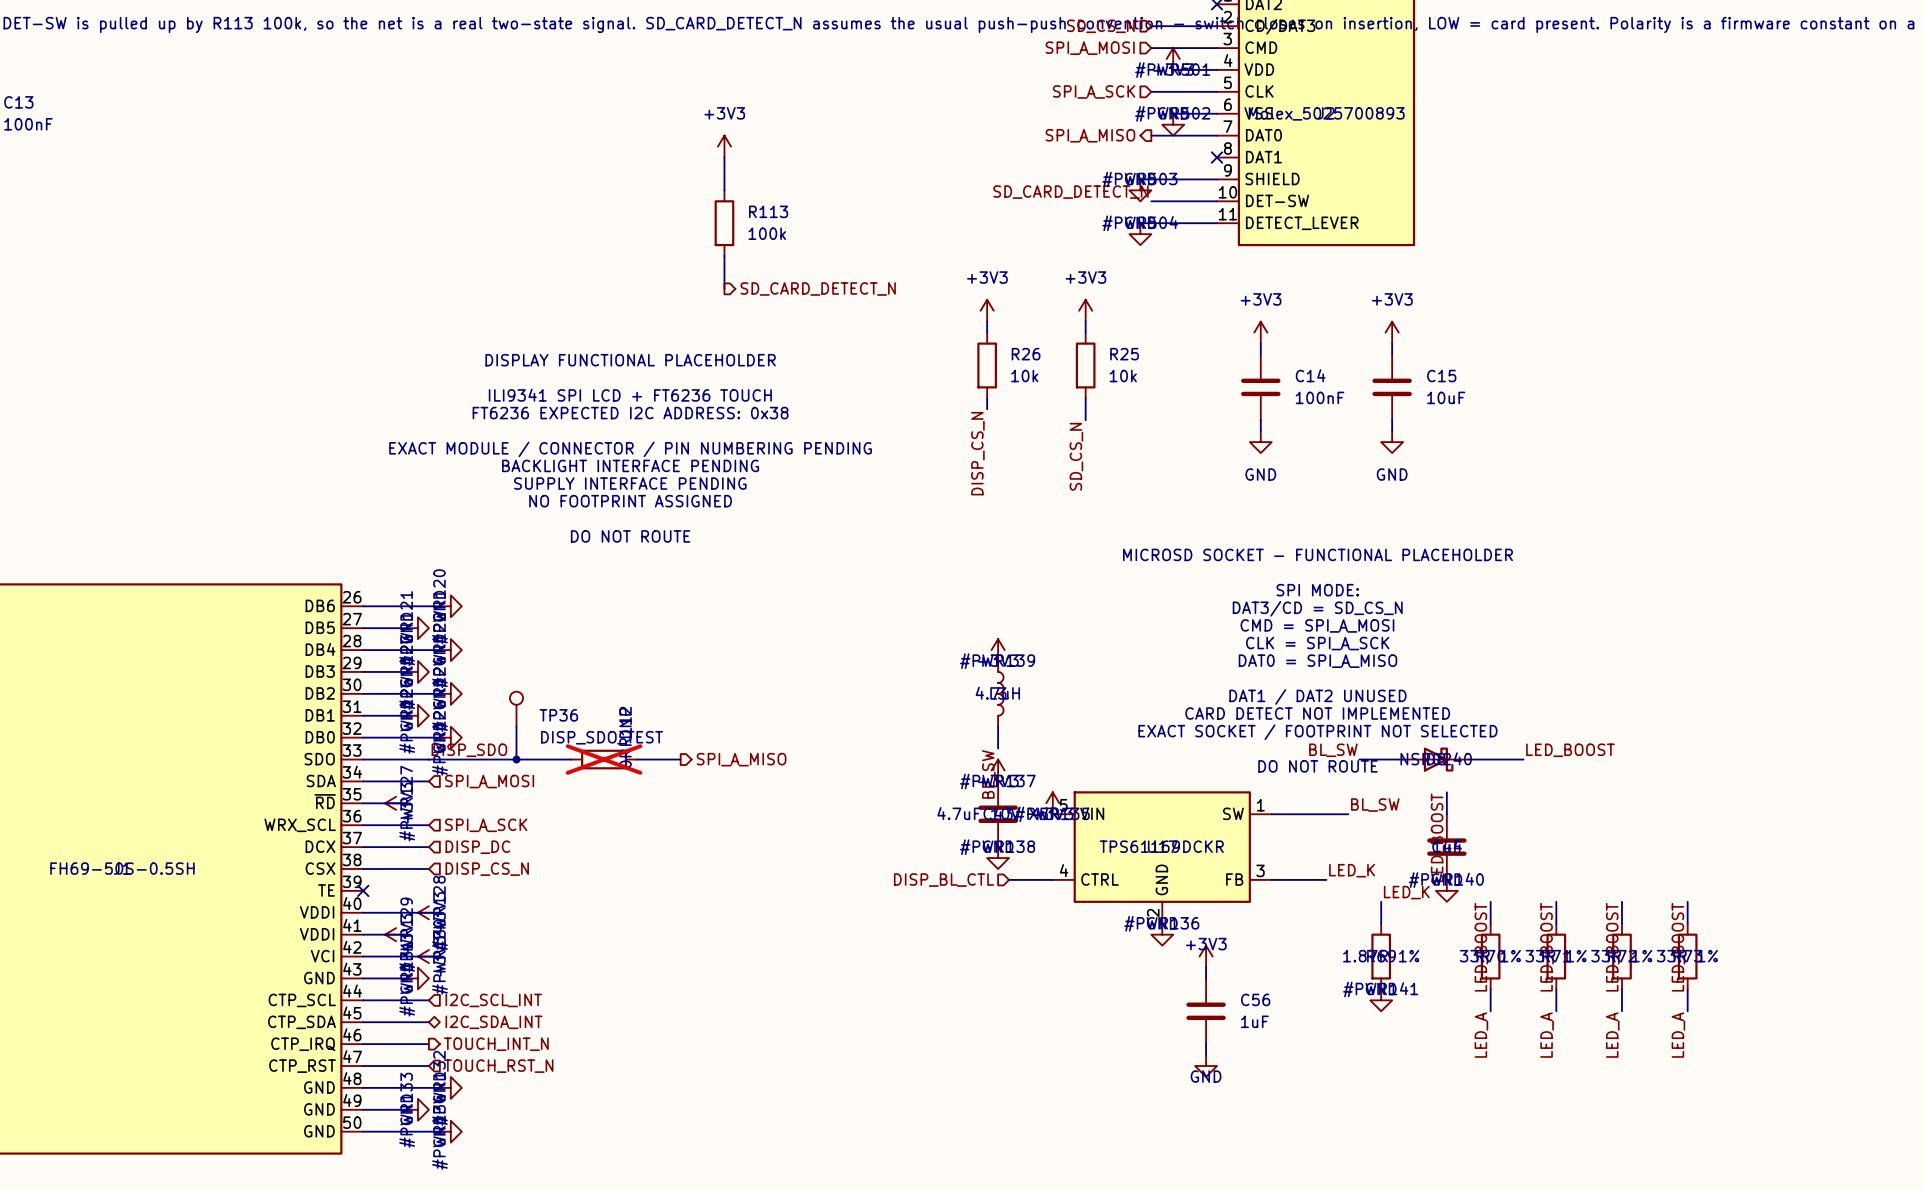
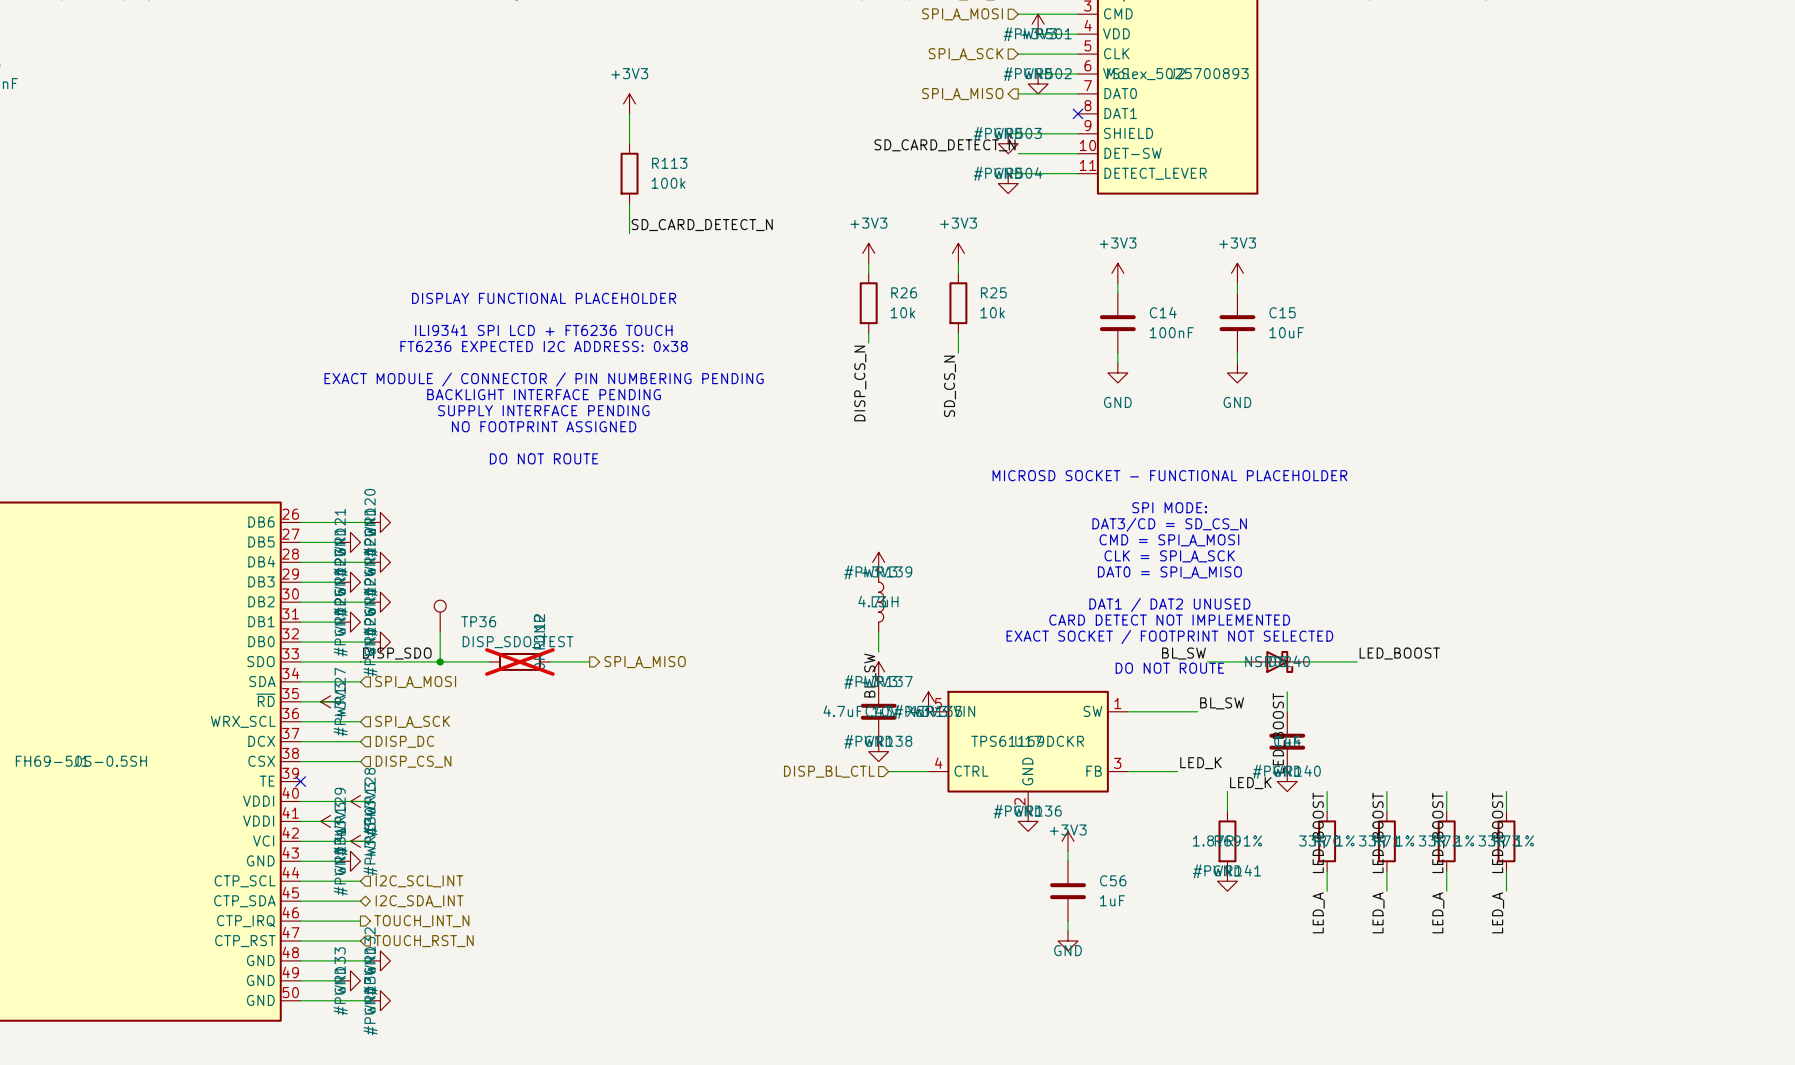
label: none -> SD_CARD_DETECT_N (702, 225)
hierarchical label: SD_CARD_DETECT_N (818, 288) -> none

